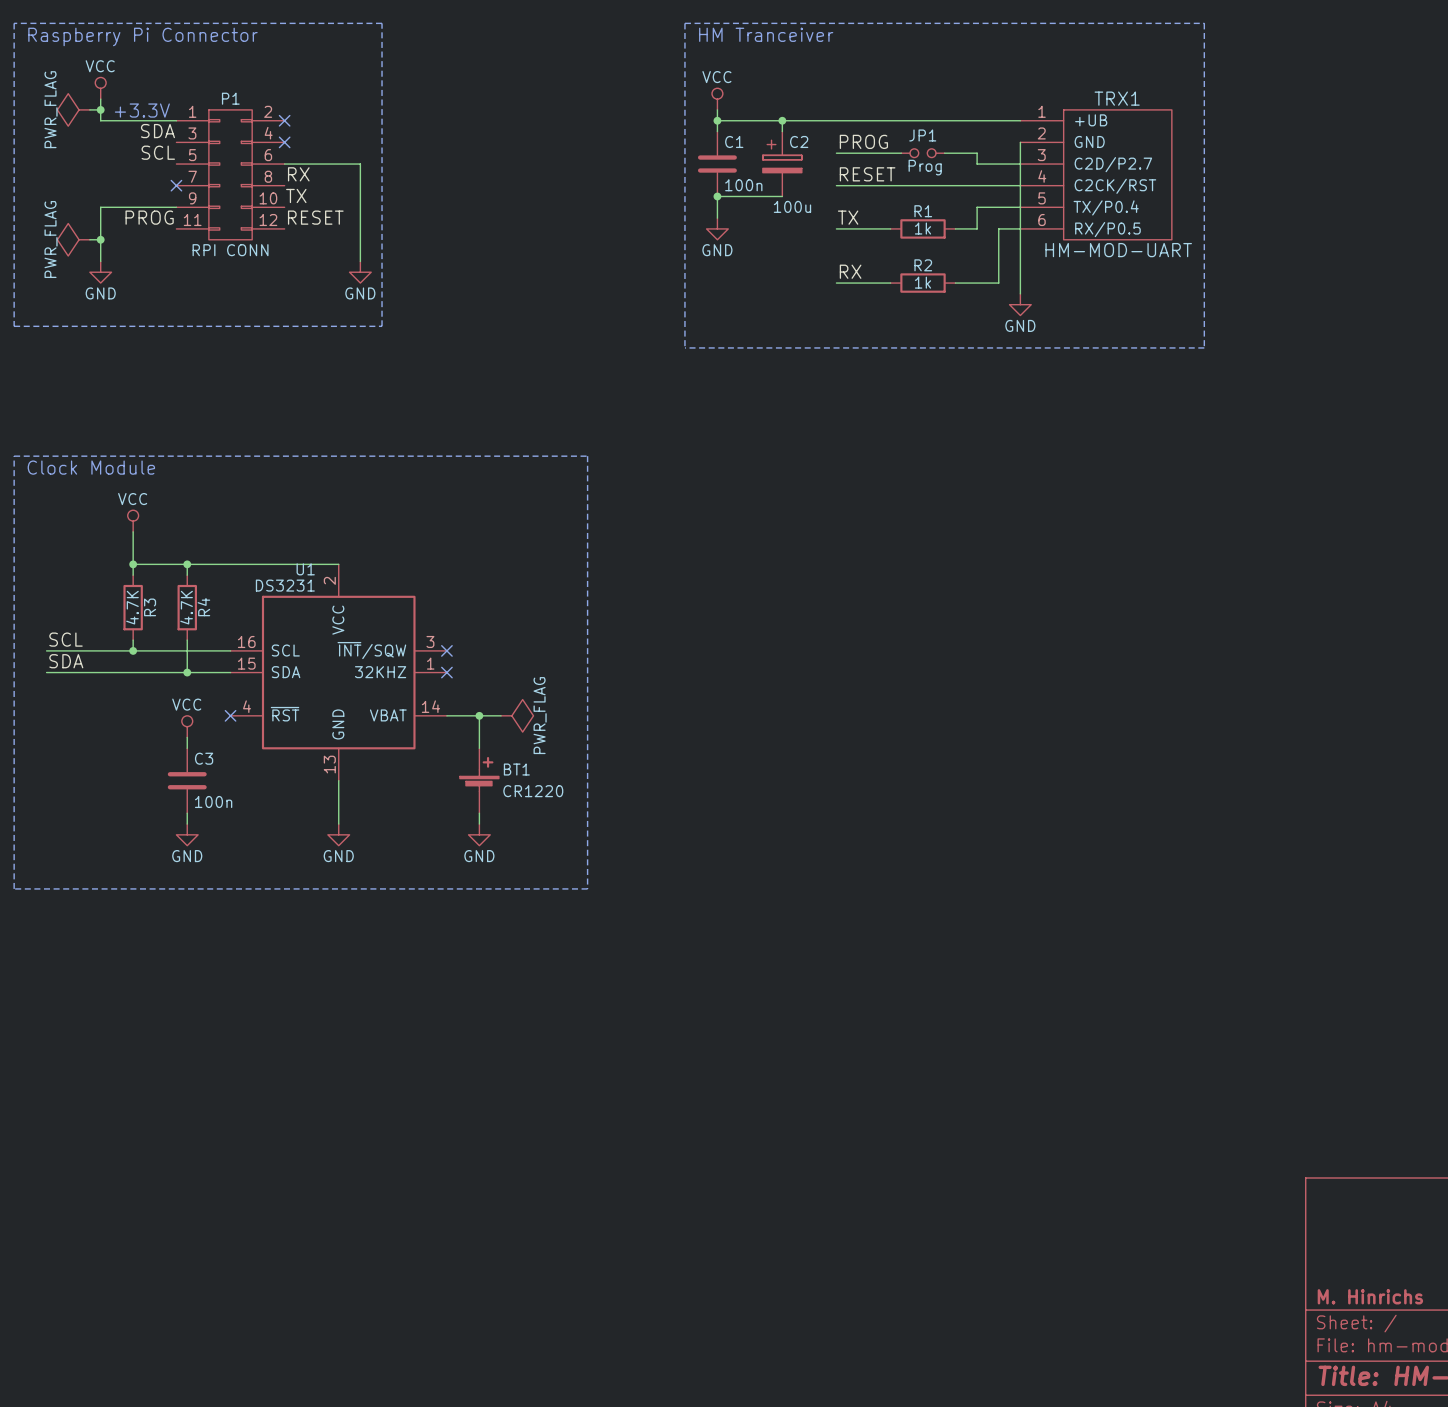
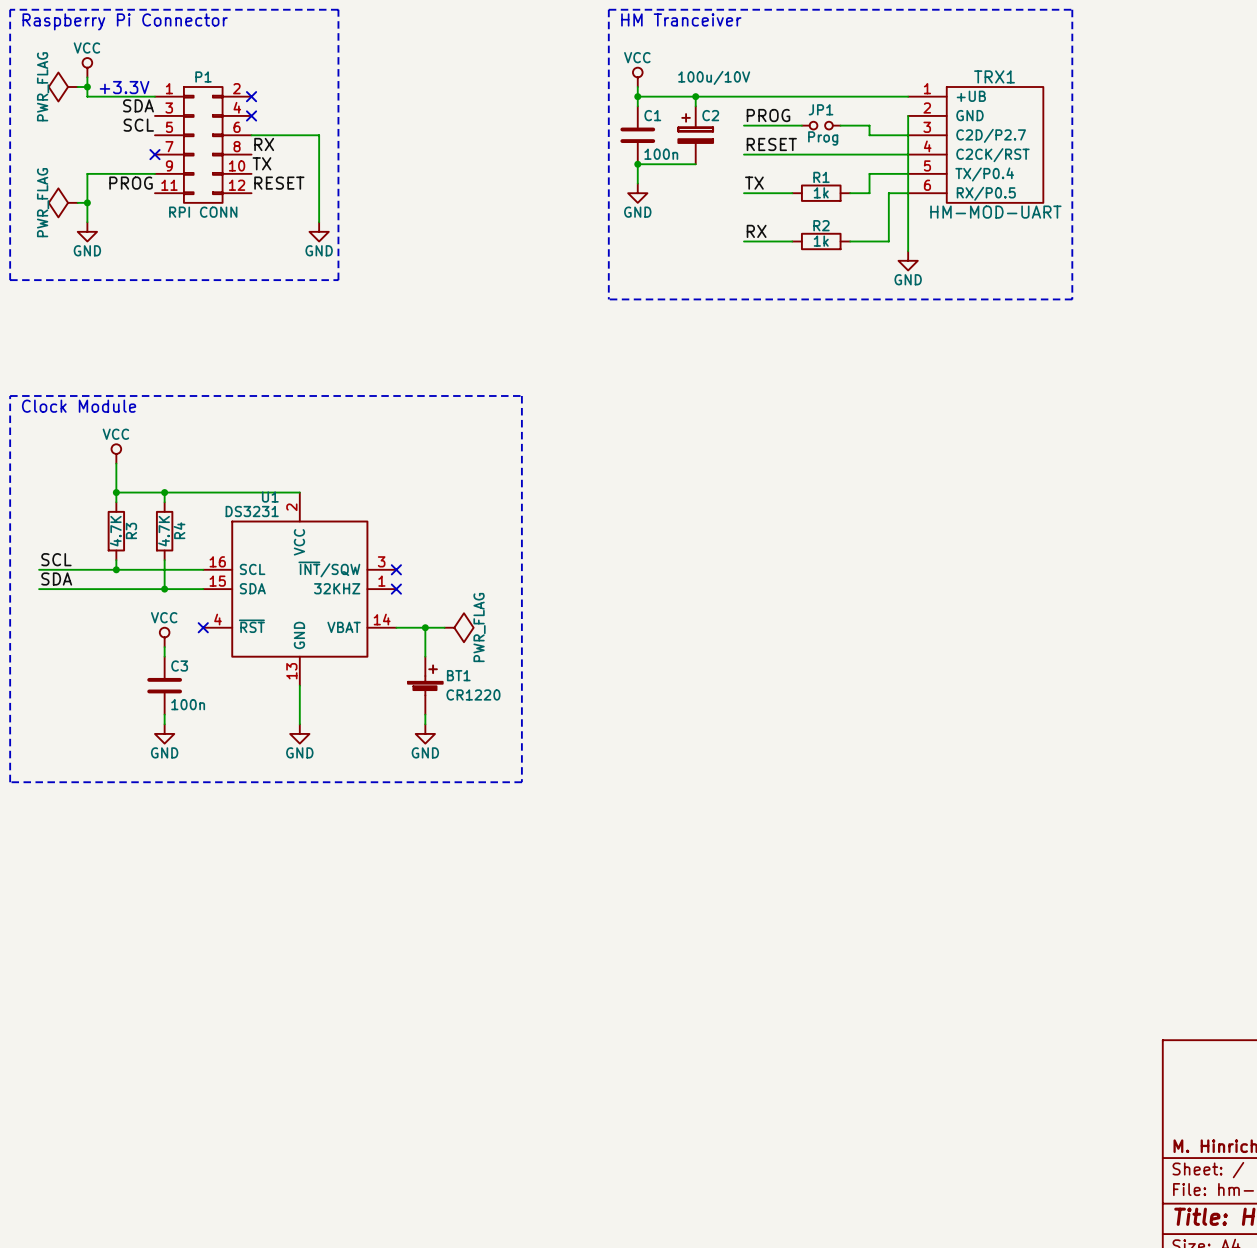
C2 value: 100u (792, 206) -> 100u/10V (714, 77)

